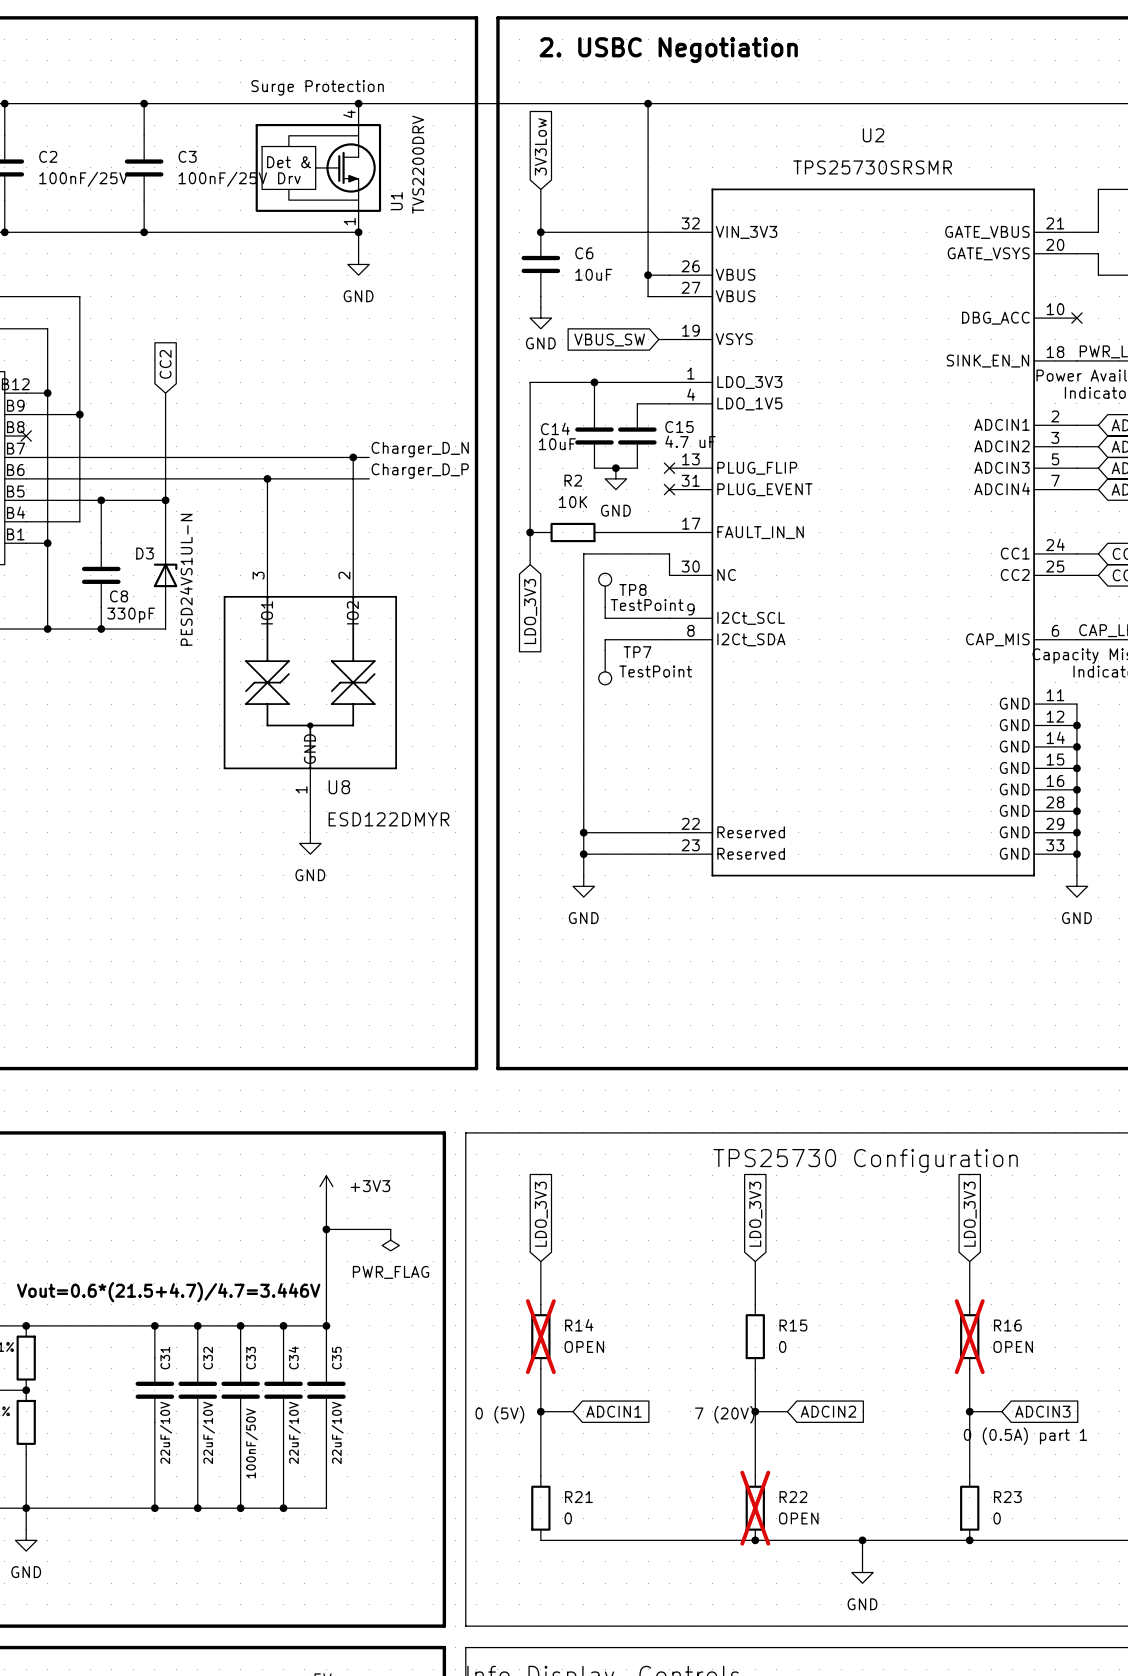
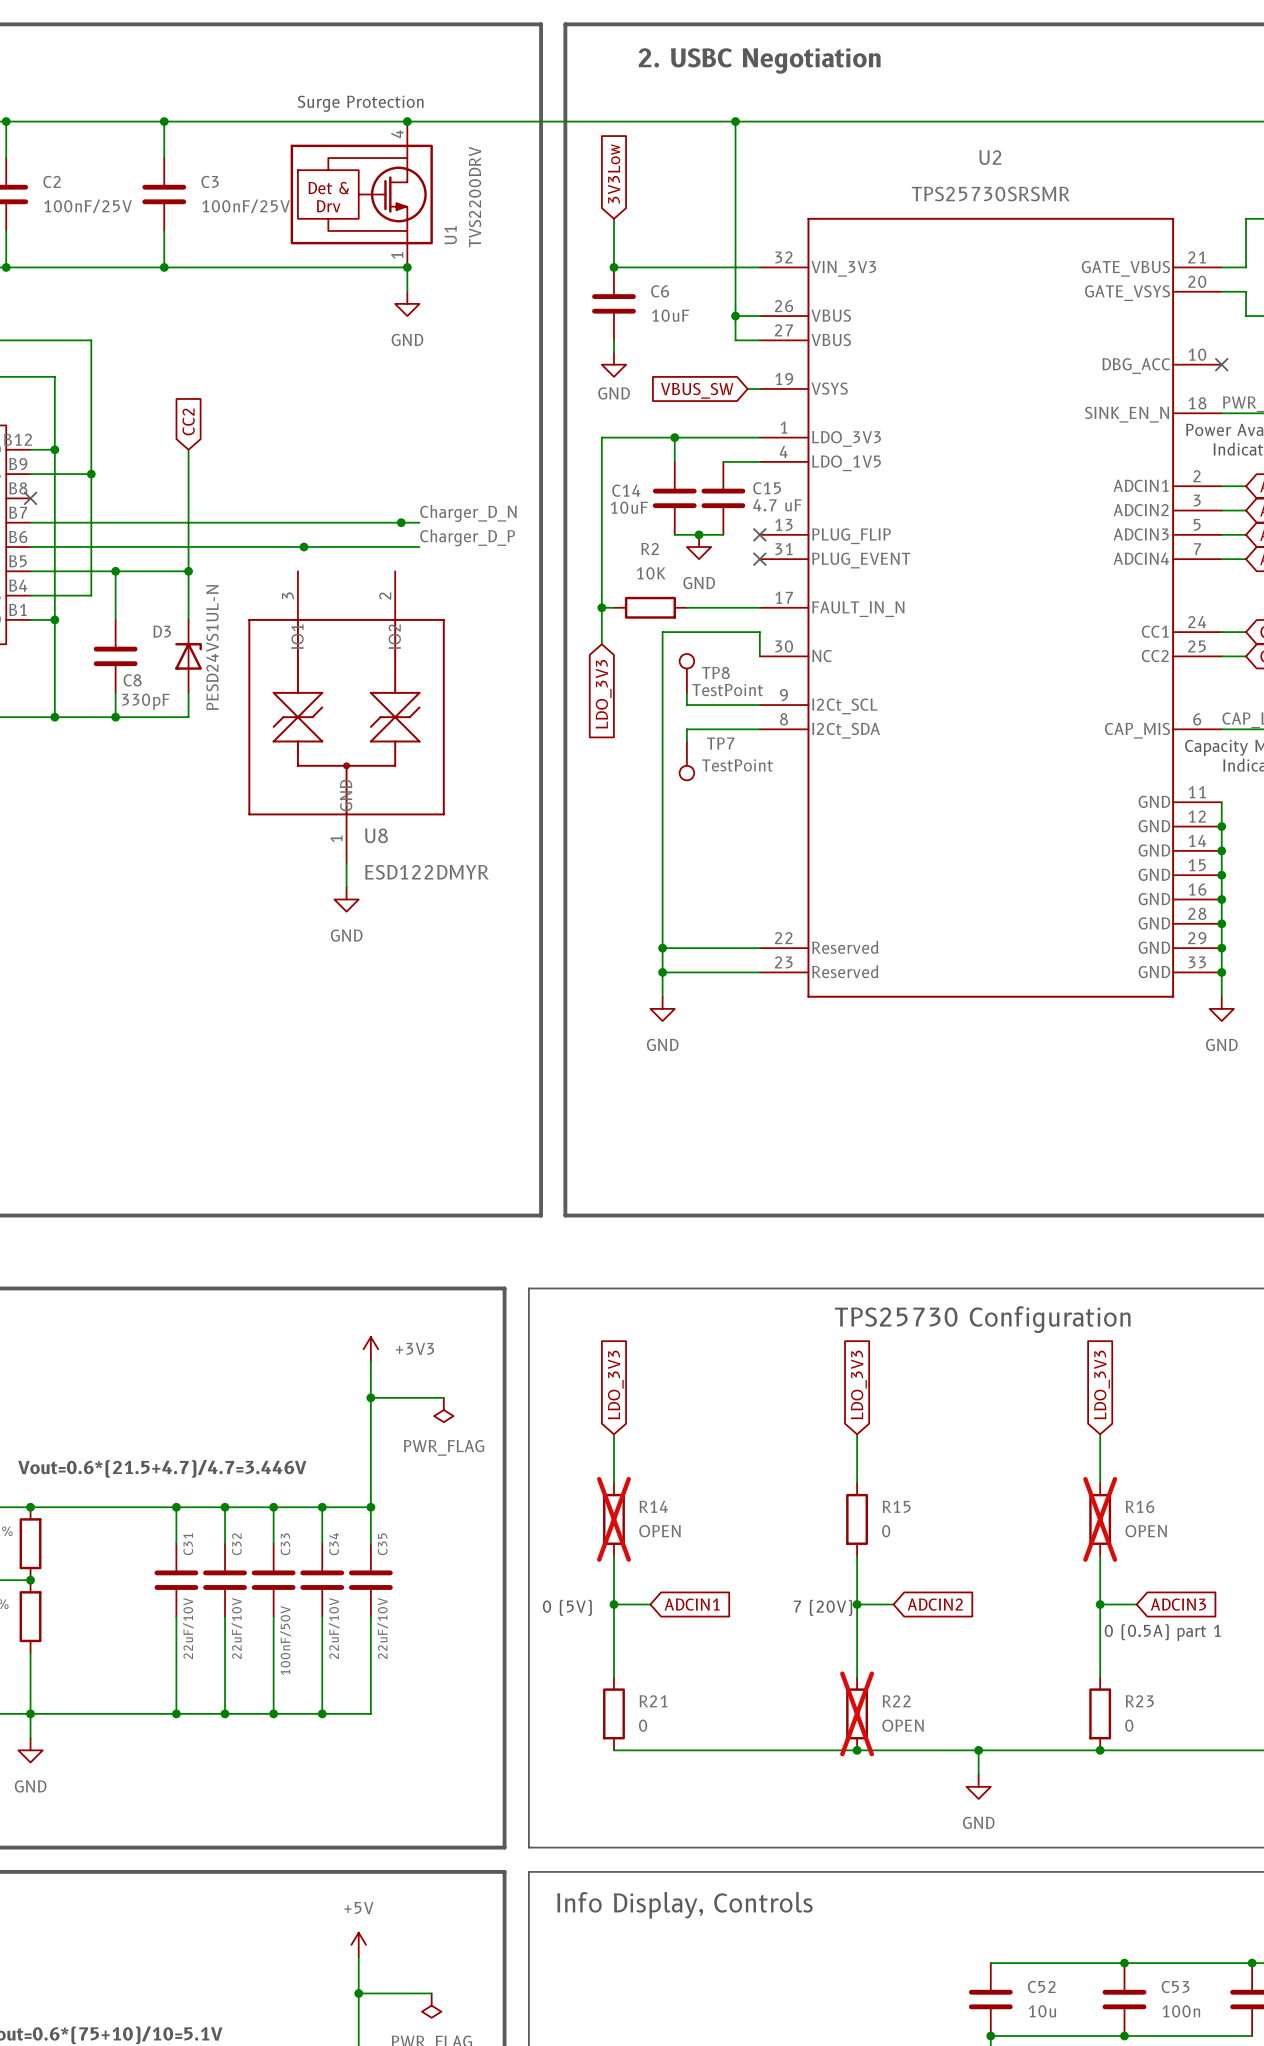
wire: (353, 457) (353, 553) -> none
wire: (267, 478) (267, 553) -> none
U8 position: (310, 682) -> (346, 717)
wire: (310, 811) (310, 832) -> (346, 863) (346, 887)
power symbol position: GND (310, 843) -> GND (346, 899)

